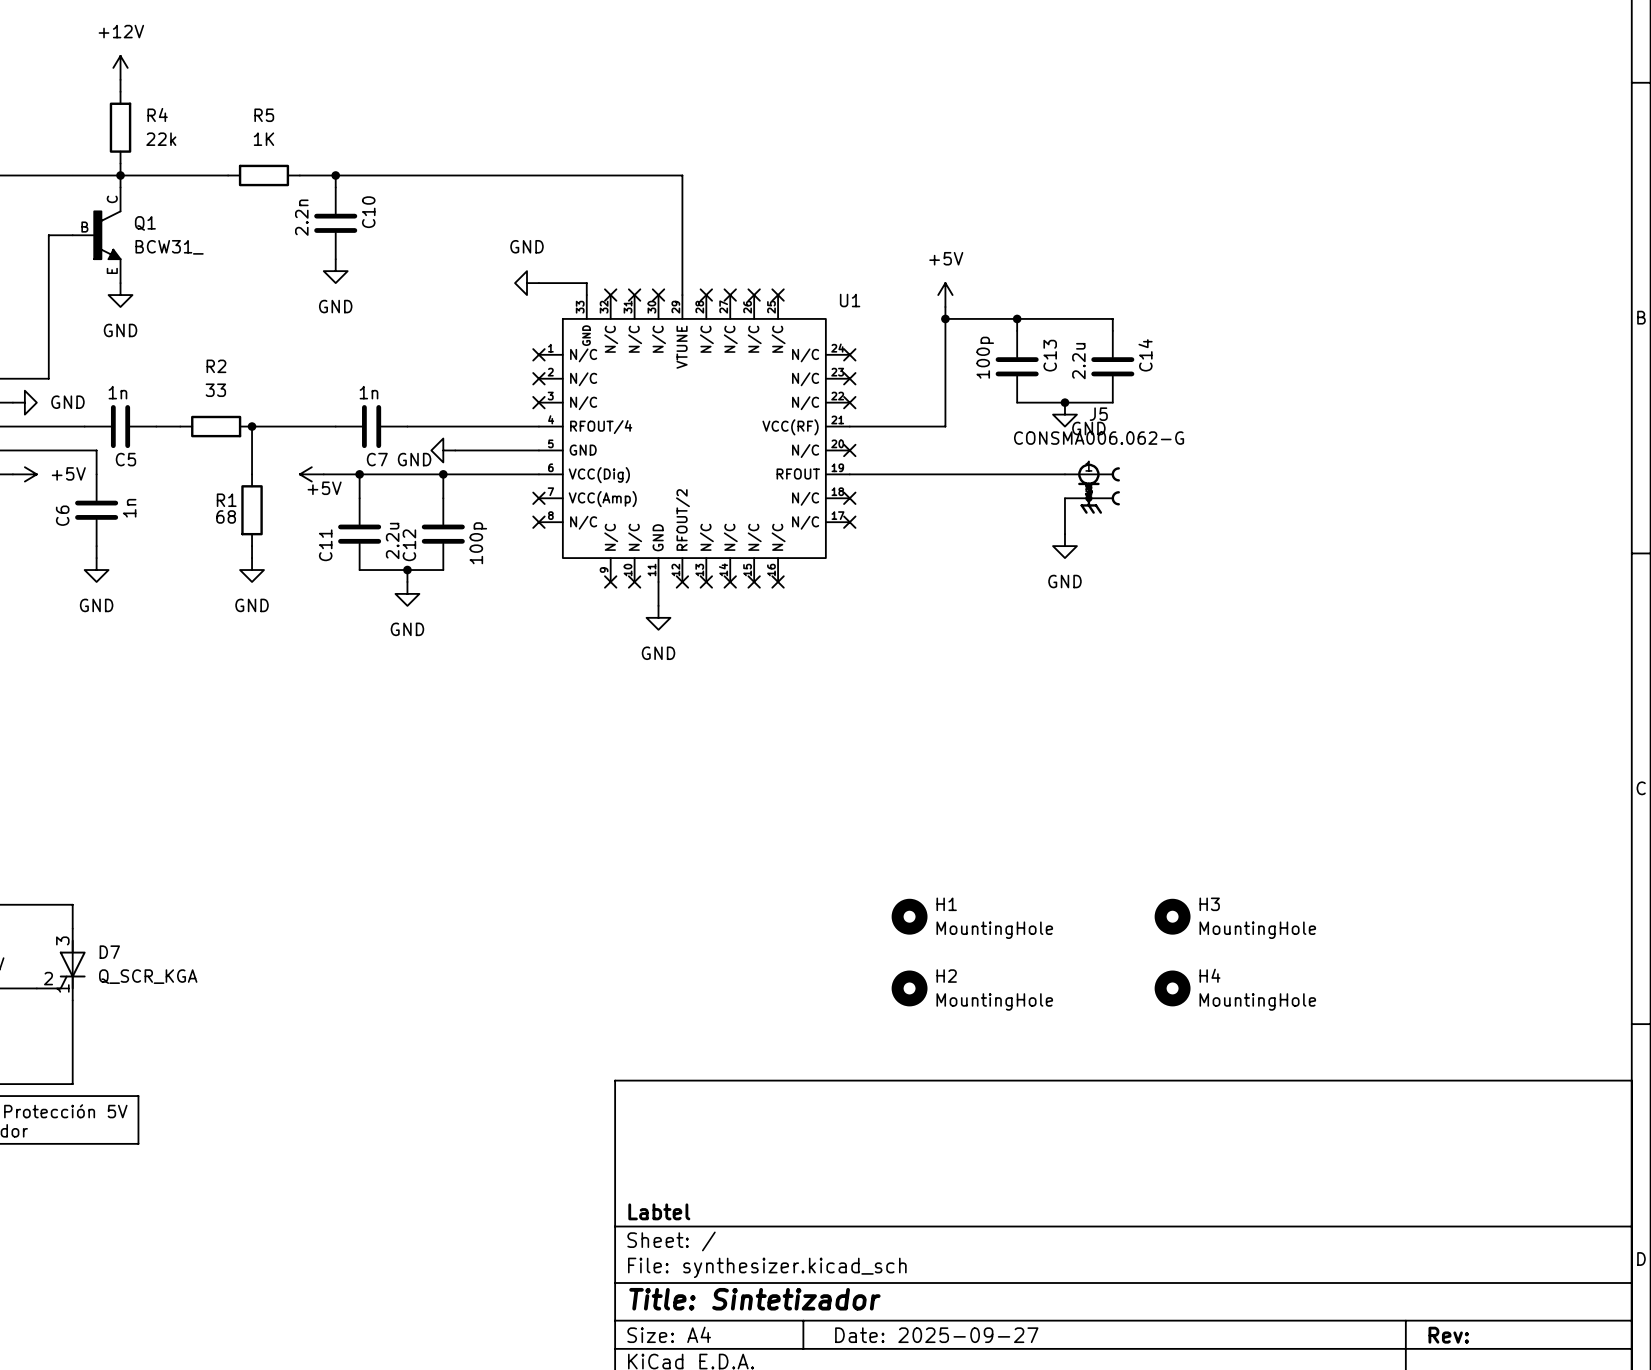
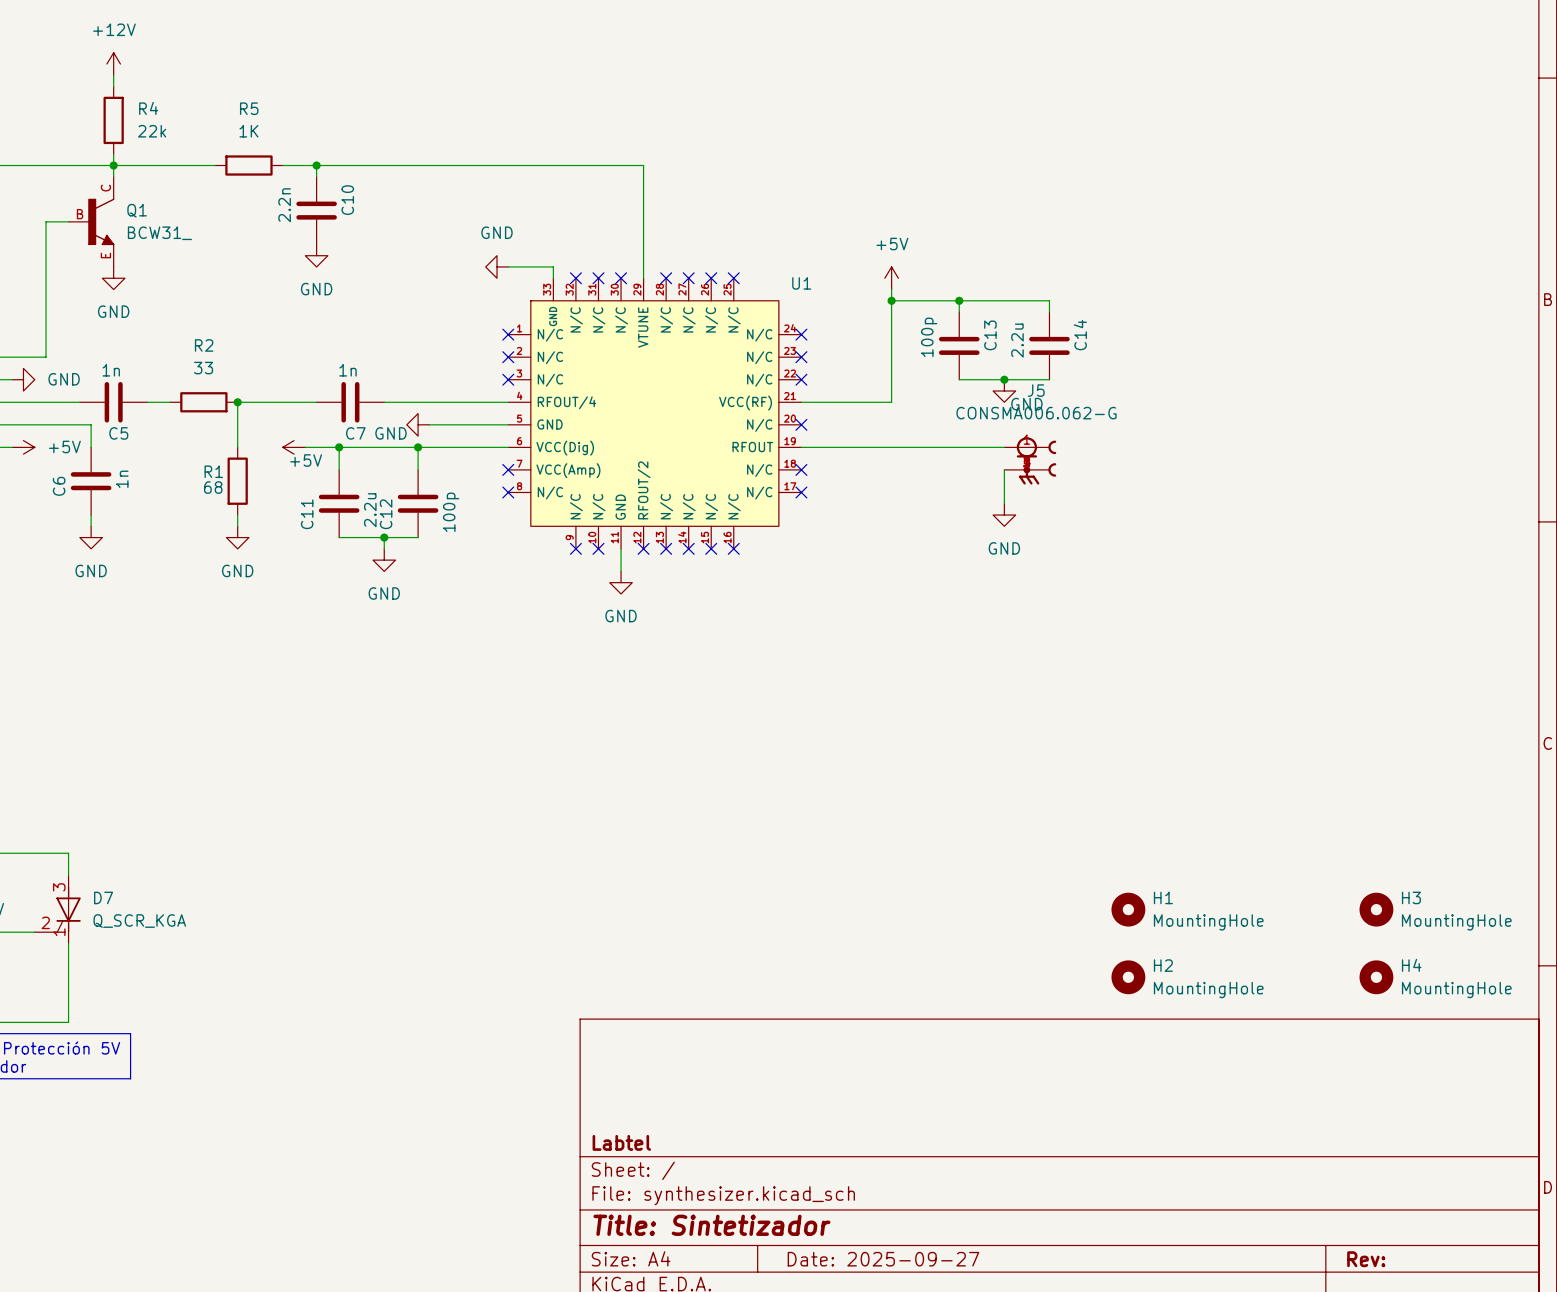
H1 position: (909, 916) -> (1128, 909)
H3 position: (1172, 916) -> (1376, 909)
H2 position: (909, 988) -> (1128, 977)
H4 position: (1172, 988) -> (1376, 977)

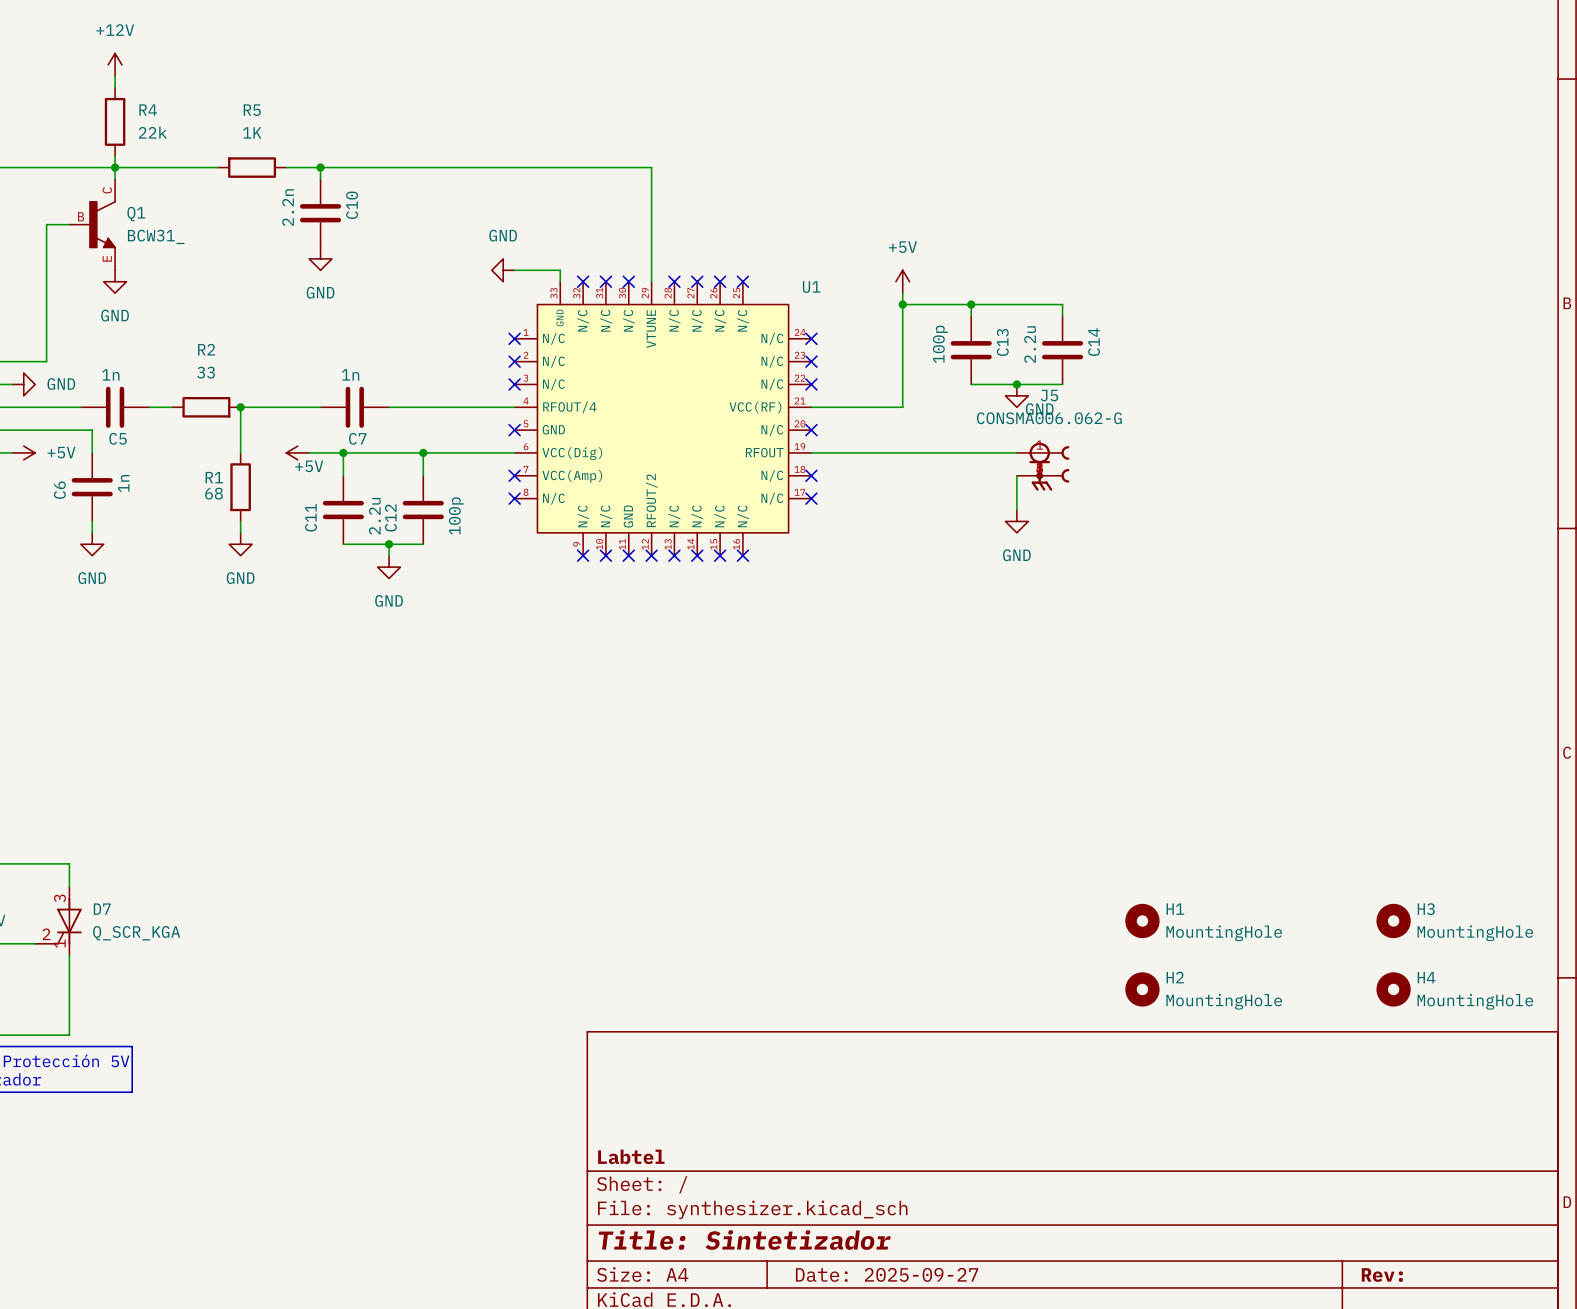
power symbol: GND (418, 424) -> none
wire: (429, 424) (508, 424) -> none
no-connect mark: none -> (514, 430)
wire: (621, 548) (621, 571) -> none
no-connect mark: none -> (628, 555)
power symbol: GND (621, 582) -> none

